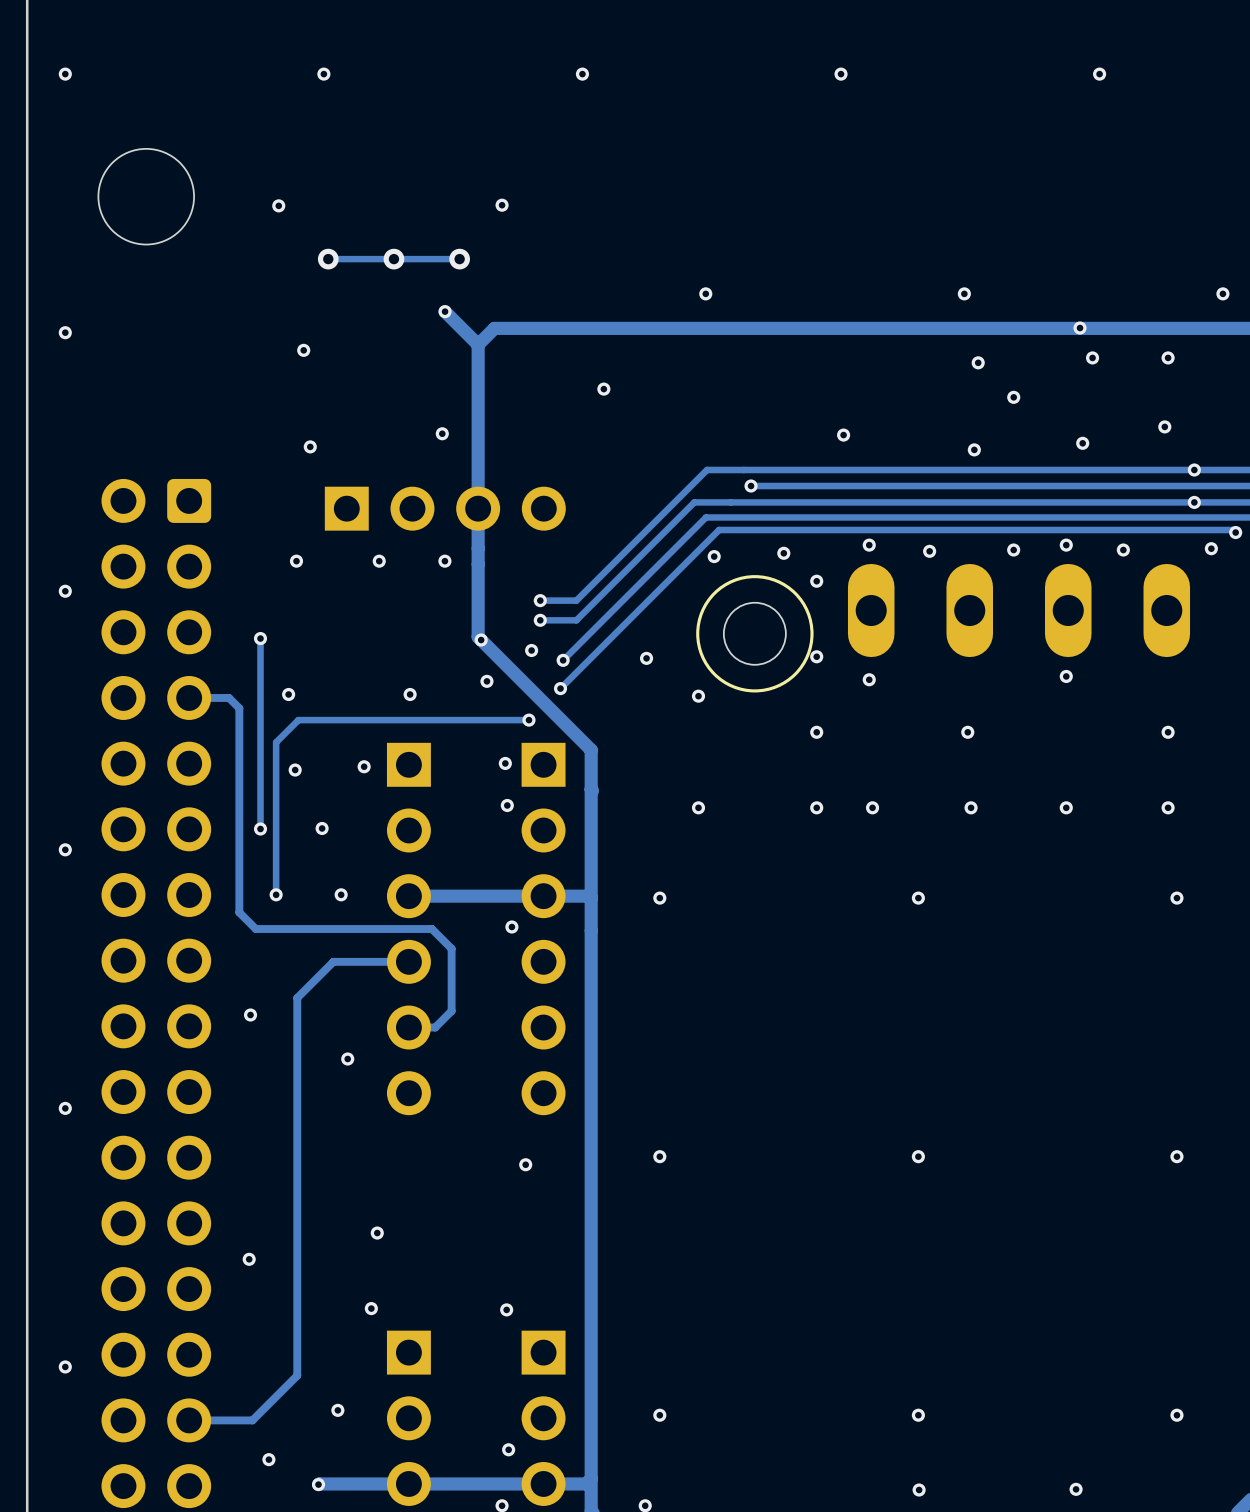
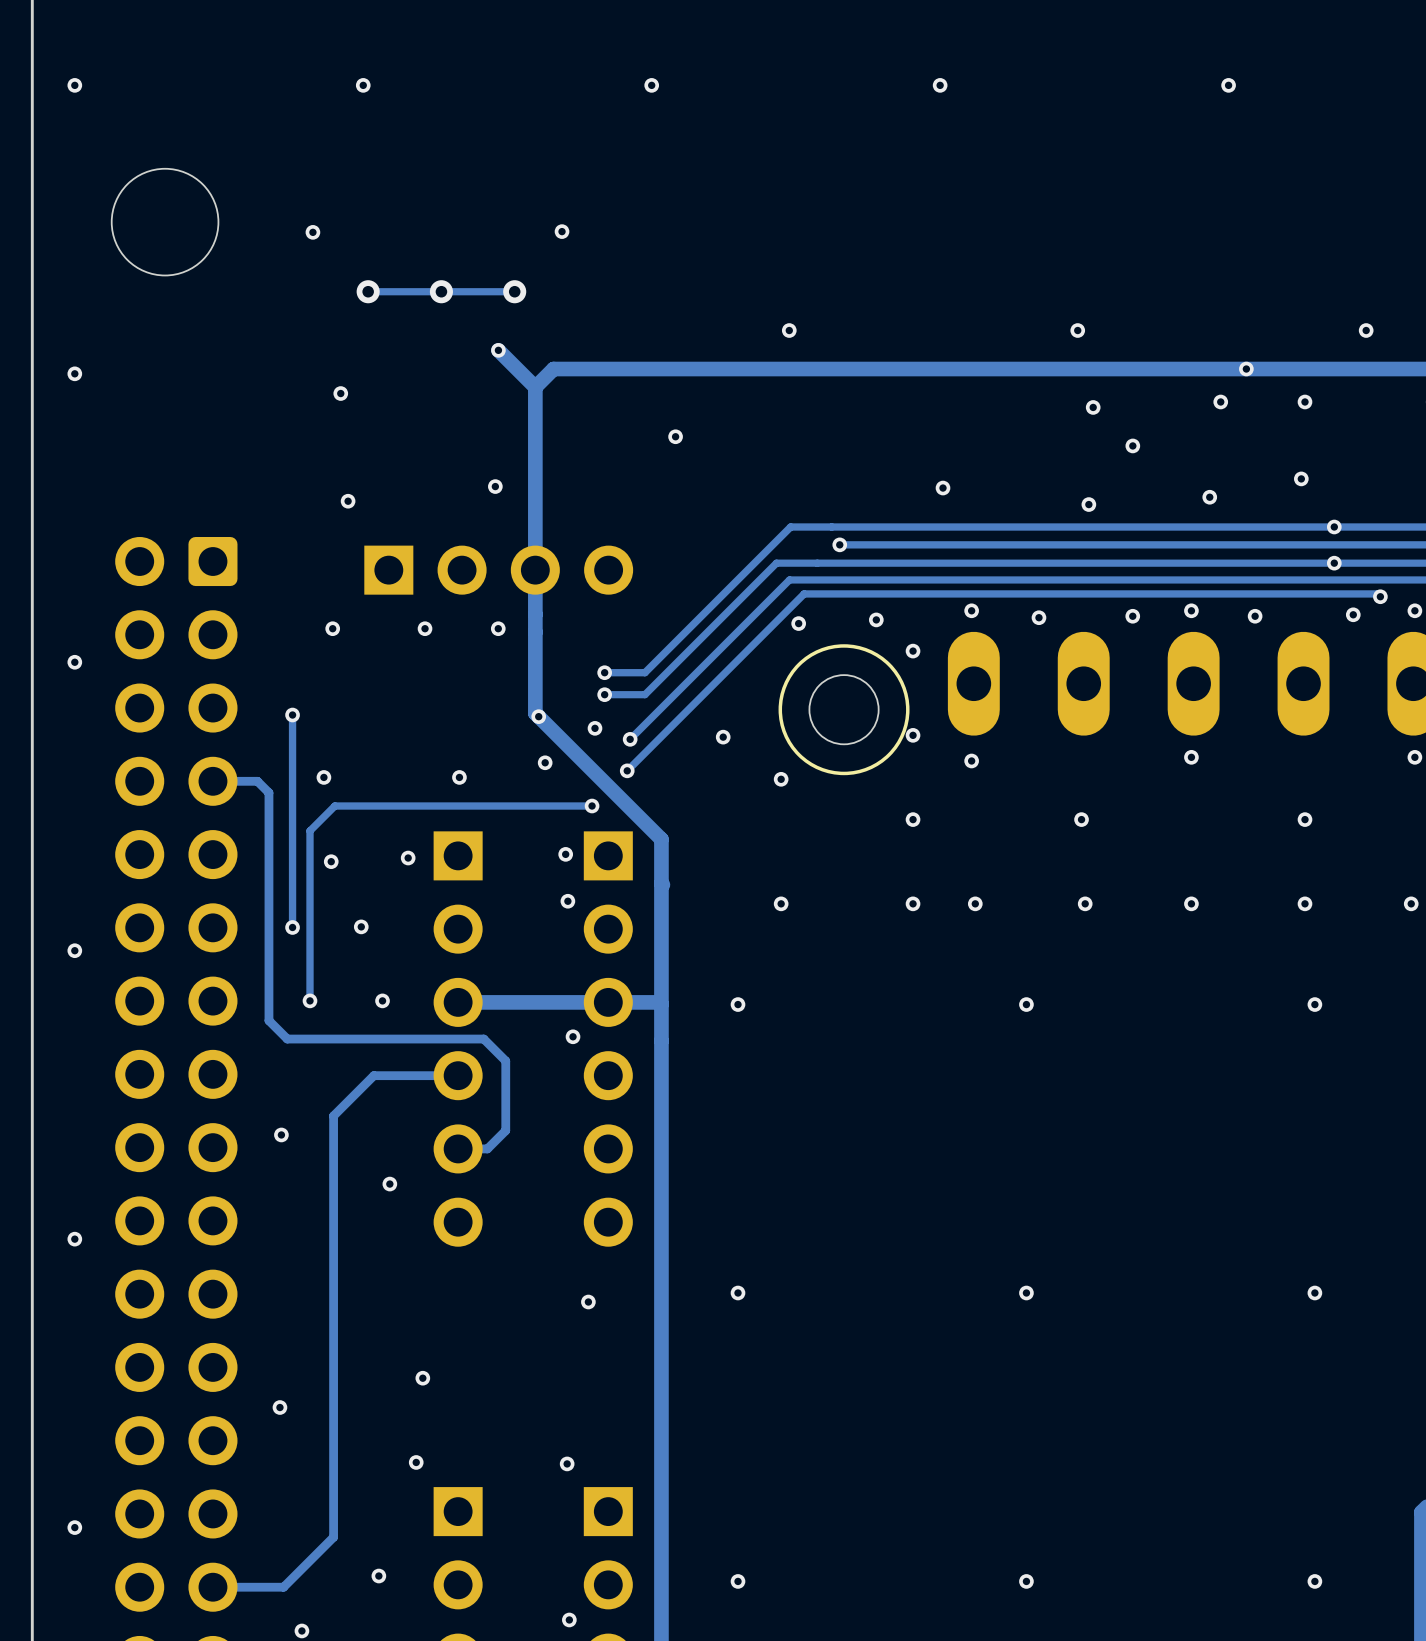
via position: (1080, 328) -> (1246, 369)

